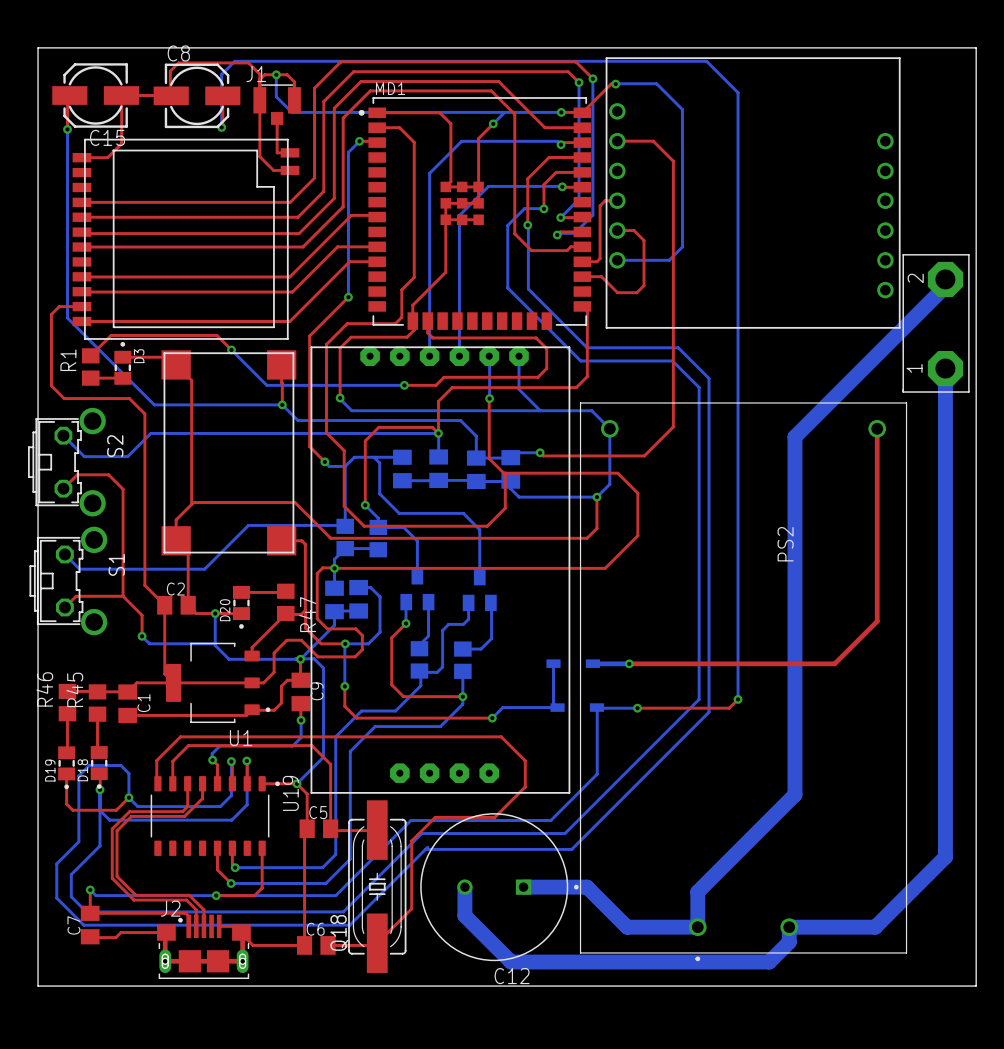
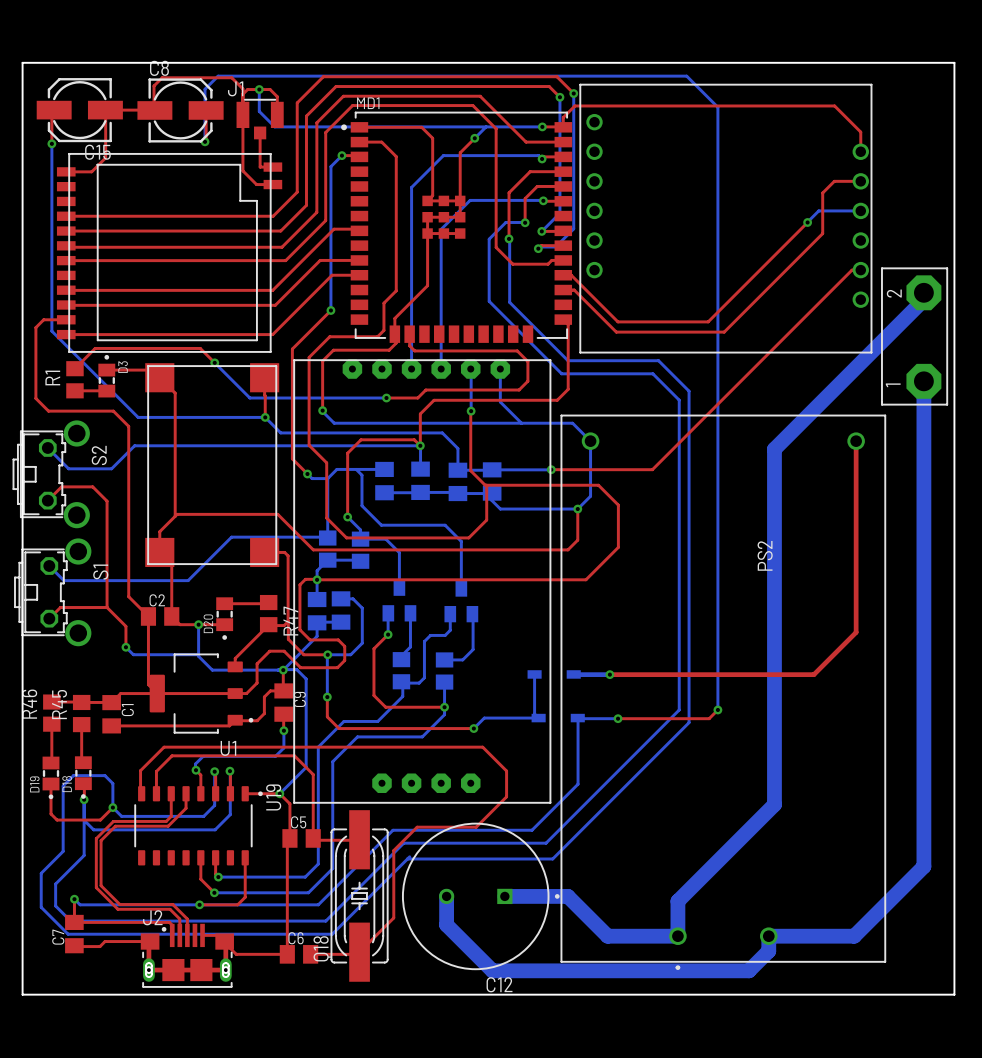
bottom track: (615, 84) (656, 83) (682, 109) (682, 247) (669, 260) (617, 260) -> none
top track: (615, 84) (611, 84) (582, 112) -> (860, 151) (860, 132) (834, 105) (574, 105) (563, 117) (563, 127)
via: (615, 84) -> none
top track: (617, 141) (653, 141) (673, 161) (673, 426) (644, 455) (543, 455) (540, 452) -> none
part rotation: 0° (753, 193) -> 180° (725, 218)
bottom track: none -> (860, 210) (818, 210) (807, 222)
top track: (617, 200) (605, 200) (600, 205) (600, 258) (597, 261) (590, 261) -> (807, 222) (708, 321) (617, 321) (571, 275)
via: none -> (807, 222)
top track: (617, 230) (634, 230) (644, 240) (644, 285) (636, 292) (617, 292) (601, 276) (593, 276) -> (860, 181) (834, 181) (822, 193) (822, 233) (724, 332) (616, 332) (574, 290)
top track: none -> (860, 270) (852, 270) (652, 469) (551, 469)
bottom track: (540, 452) (515, 452) (510, 457) -> (551, 469) (492, 469)
via position: (540, 452) -> (551, 469)

